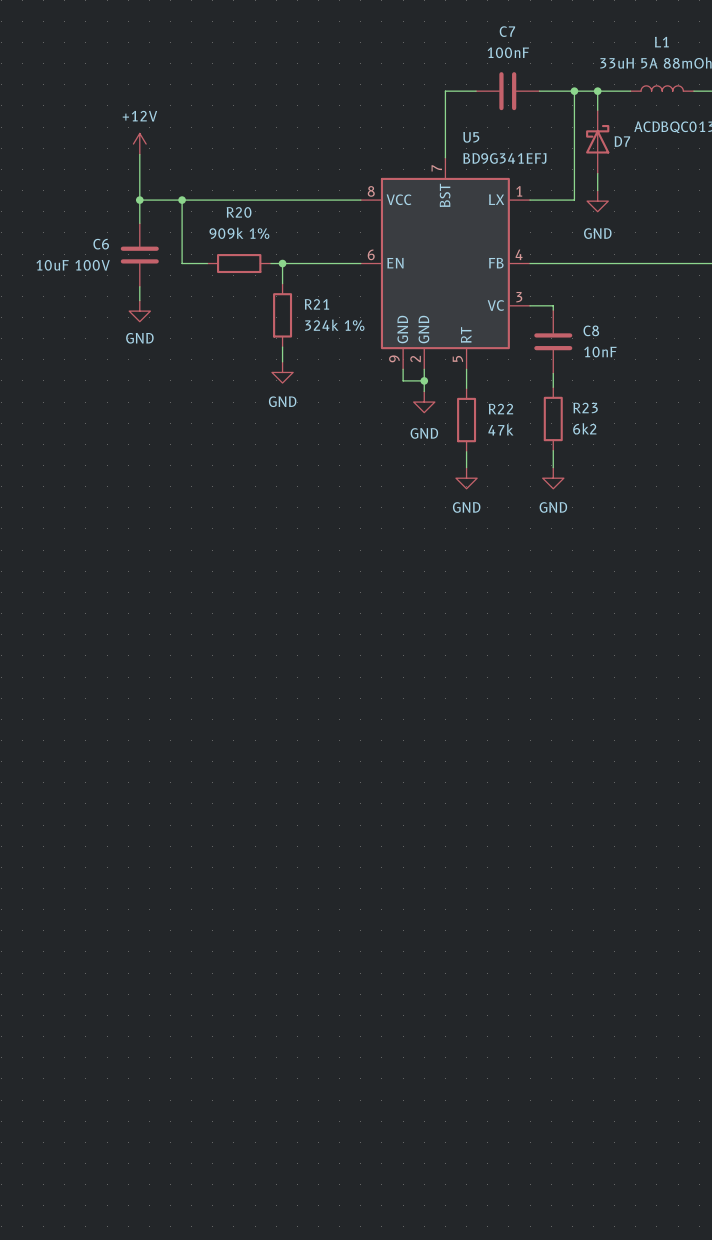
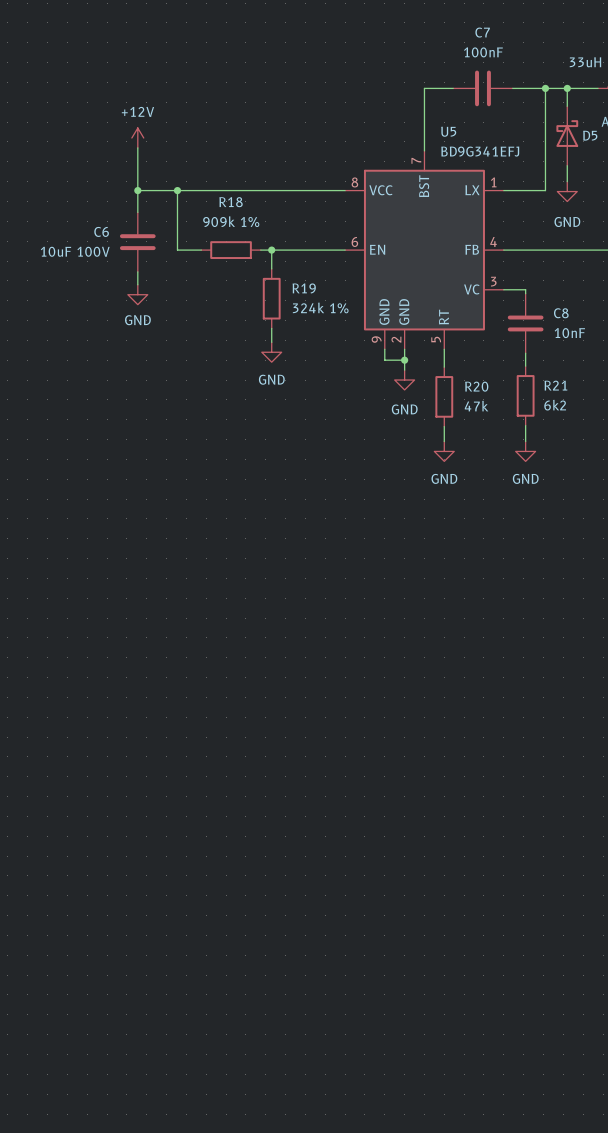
D7 name: D7 (622, 141) -> D5 (590, 135)
R20 name: R20 (239, 212) -> R18 (231, 202)
R21 name: R21 (316, 304) -> R19 (304, 288)
R23 name: R23 (585, 408) -> R21 (555, 385)
R22 name: R22 (500, 409) -> R20 (476, 386)

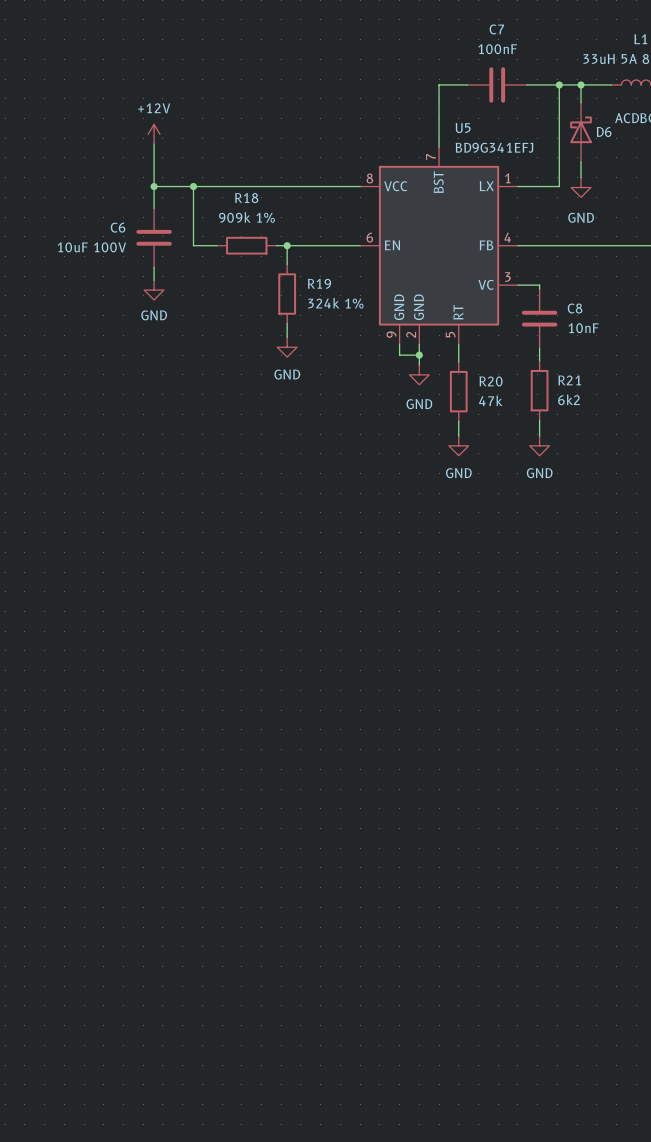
D5 name: D5 (590, 135) -> D6 (604, 132)

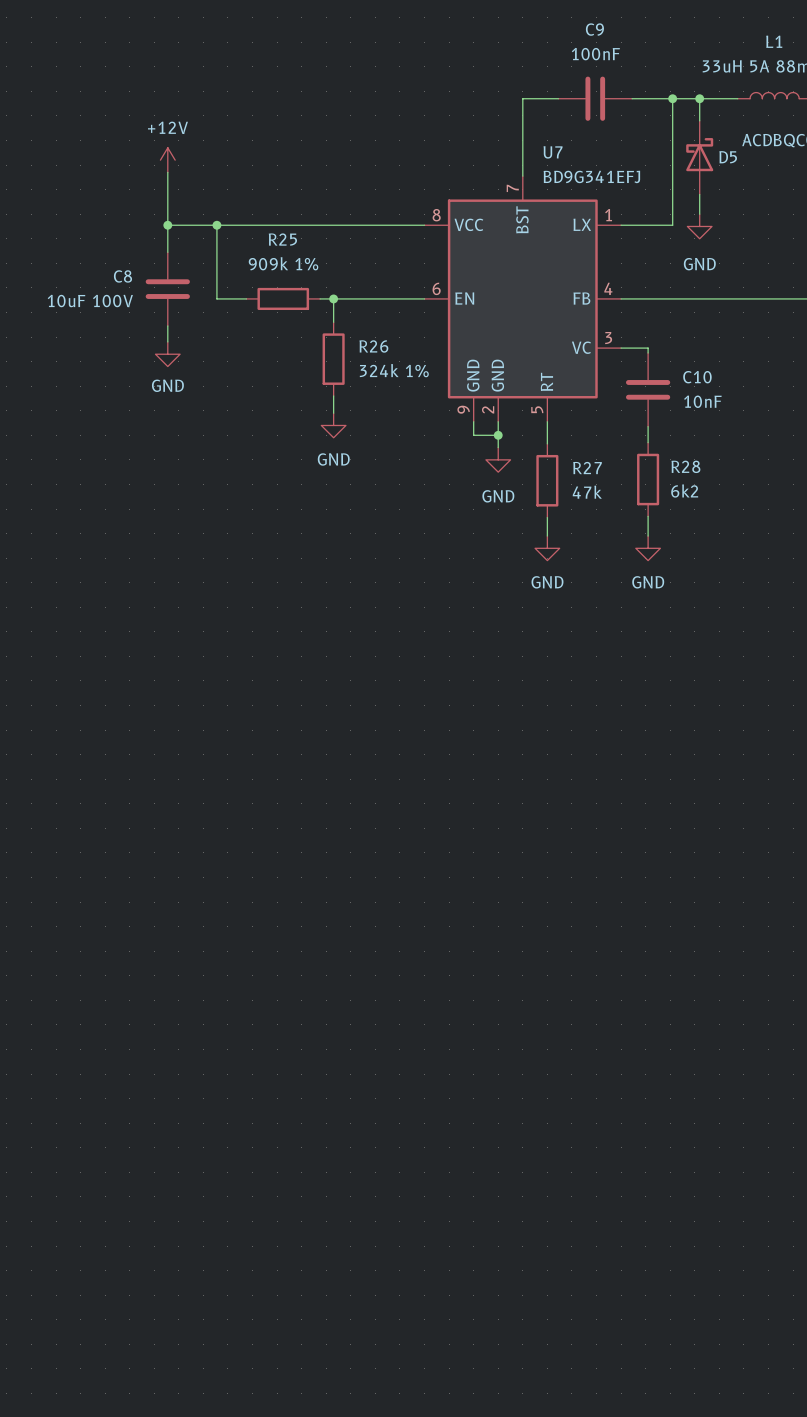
C7 name: C7 (496, 29) -> C9 (594, 29)
U5 name: U5 (463, 128) -> U7 (553, 152)
D6 name: D6 (604, 132) -> D5 (728, 157)
R18 name: R18 (246, 198) -> R25 (282, 239)
C6 name: C6 (118, 227) -> C8 (122, 276)
R19 name: R19 (319, 283) -> R26 (373, 346)
C8 name: C8 (575, 308) -> C10 (697, 377)
R21 name: R21 (569, 380) -> R28 (685, 466)
R20 name: R20 (491, 381) -> R27 (587, 468)

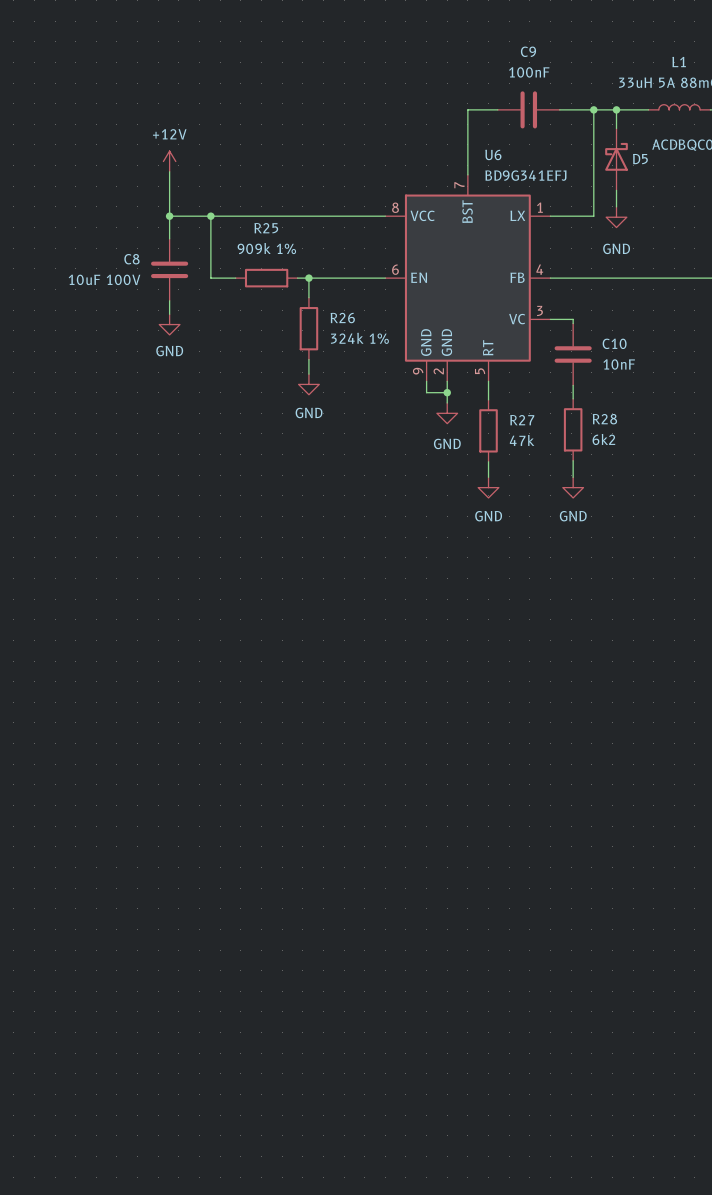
U7 name: U7 (553, 152) -> U6 (493, 154)

